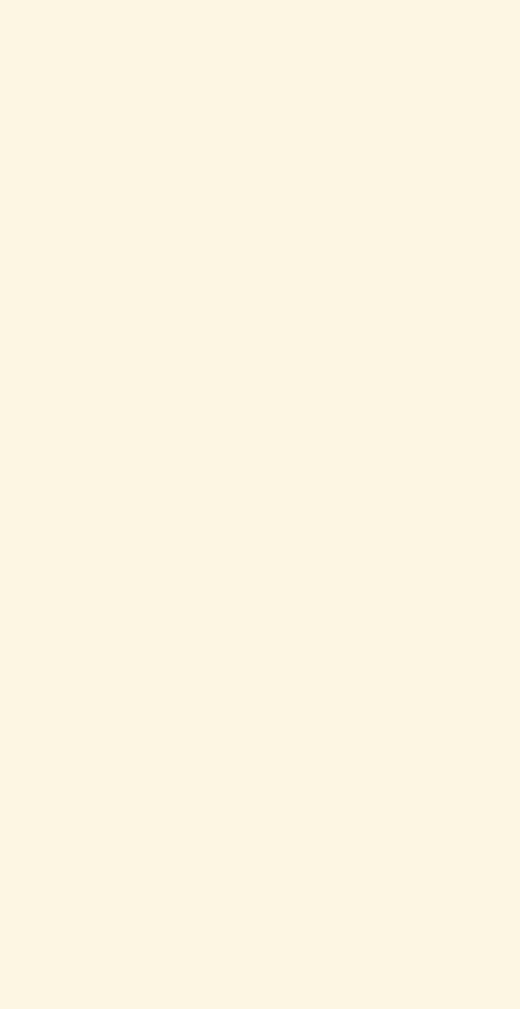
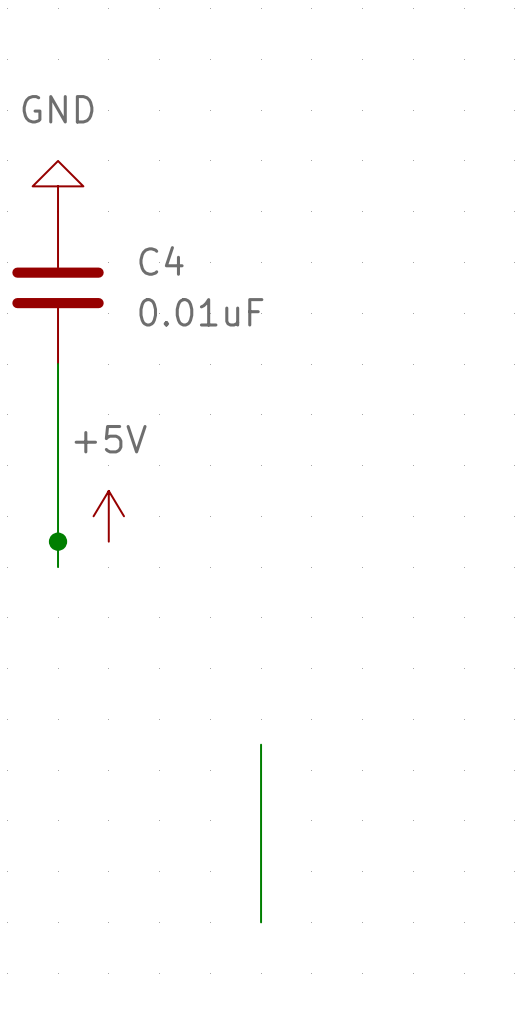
power symbol: none -> GND (58, 186)
C4: none -> 0.01uF (58, 287)
wire: none -> (58, 364) (58, 567)
power symbol: none -> +5V (108, 516)
junction: none -> (58, 541)
wire: none -> (261, 744) (261, 922)

